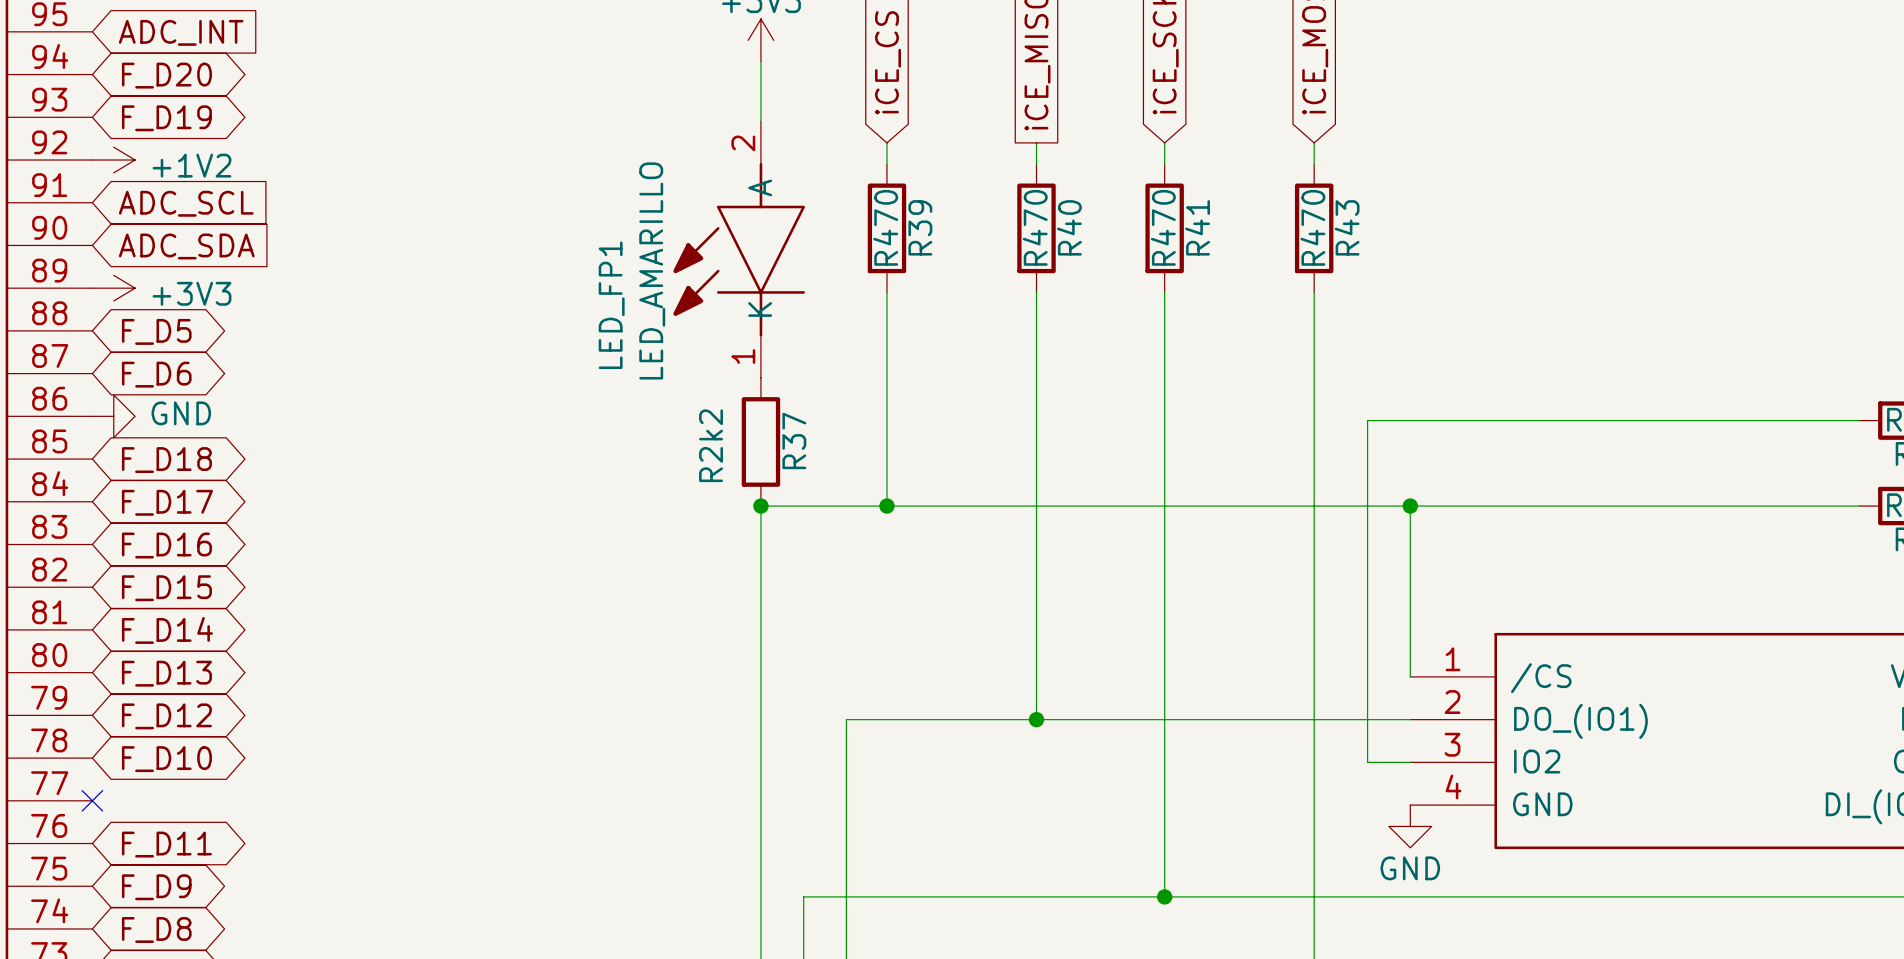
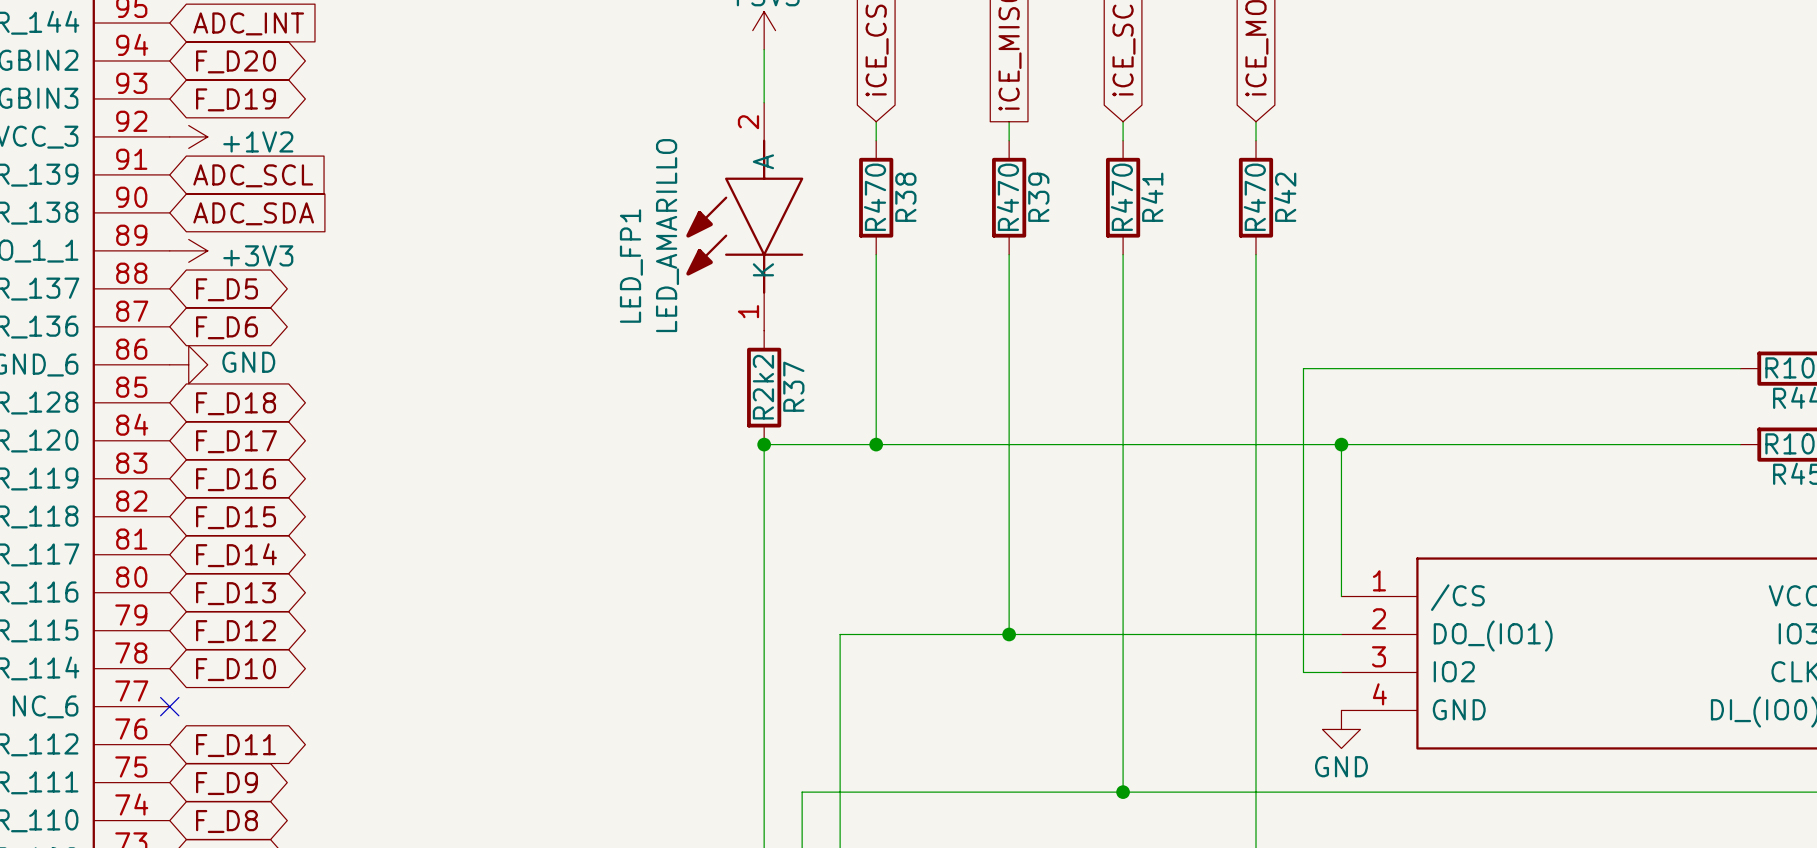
R39 name: R39 (920, 227) -> R38 (905, 197)
R40 name: R40 (1069, 227) -> R39 (1038, 197)
R43 name: R43 (1347, 227) -> R42 (1285, 197)
R37 value position: R2k2 (711, 445) -> R2k2 (763, 387)

